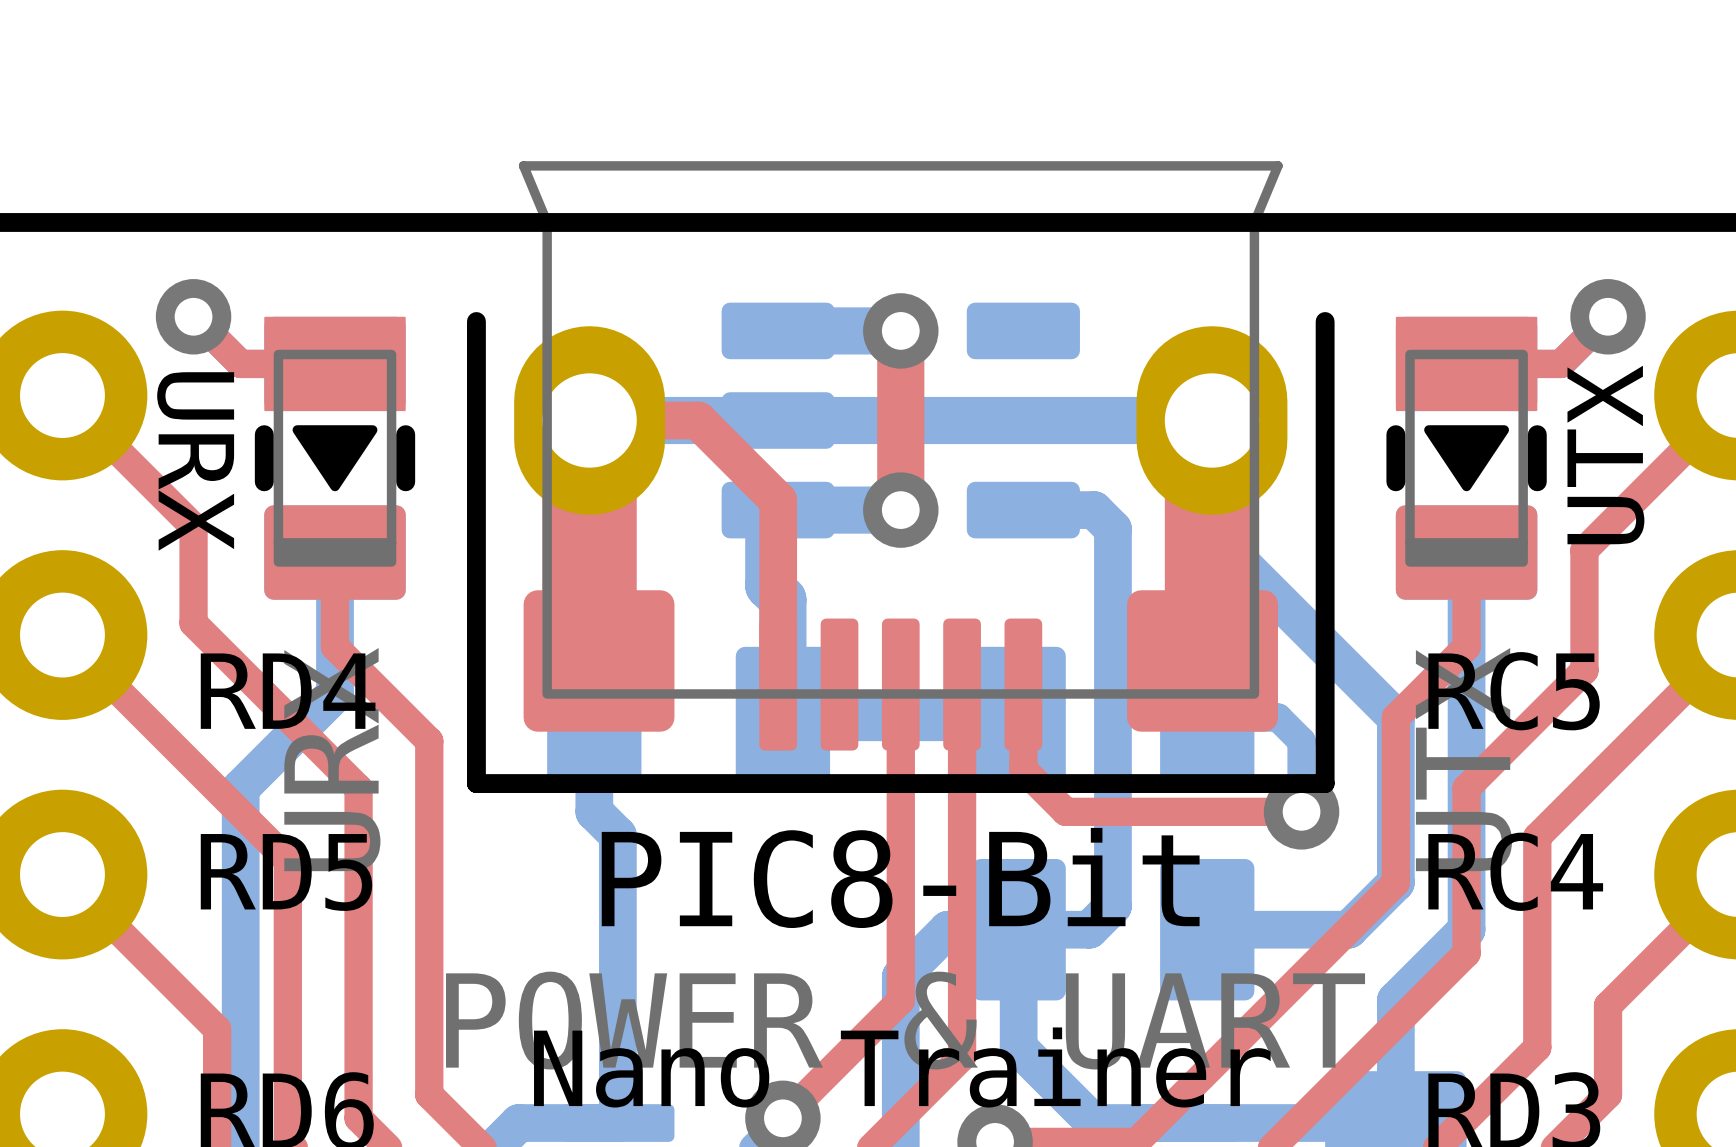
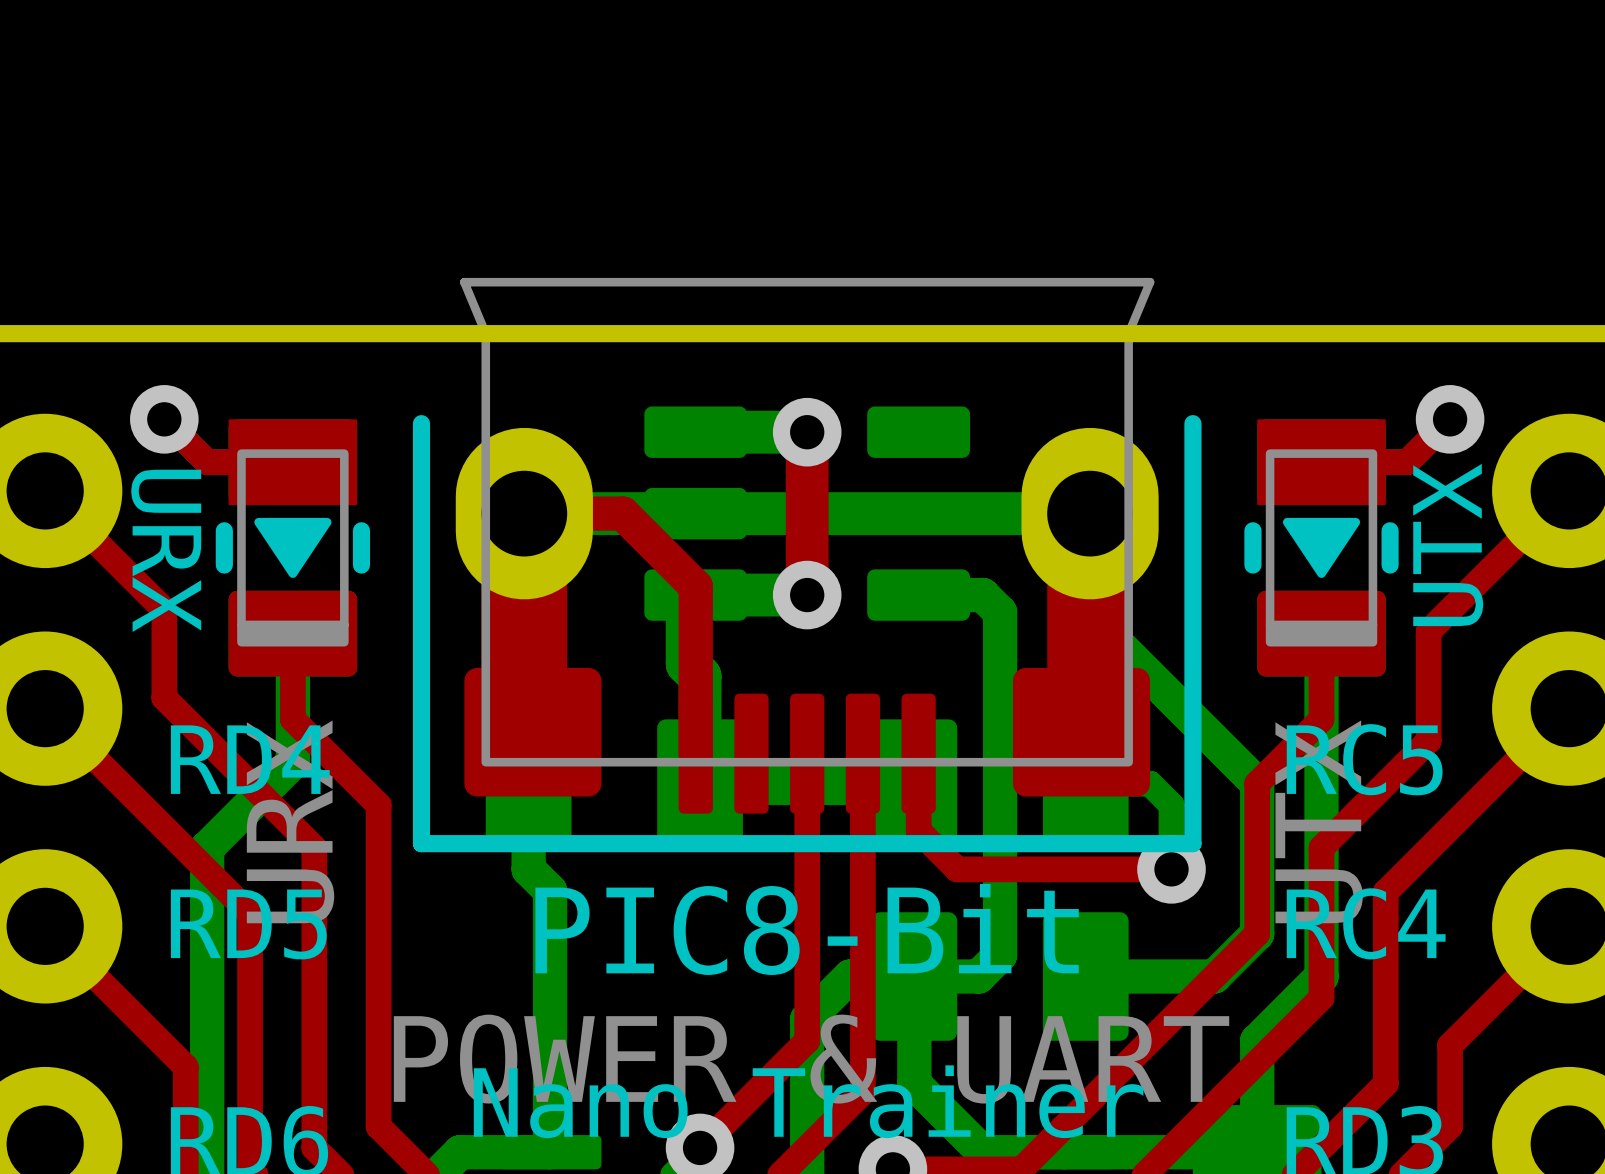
part footprint: [254, 316, 416, 600] -> [215, 419, 371, 677]
part footprint: [1386, 316, 1547, 600] -> [1244, 419, 1399, 677]

